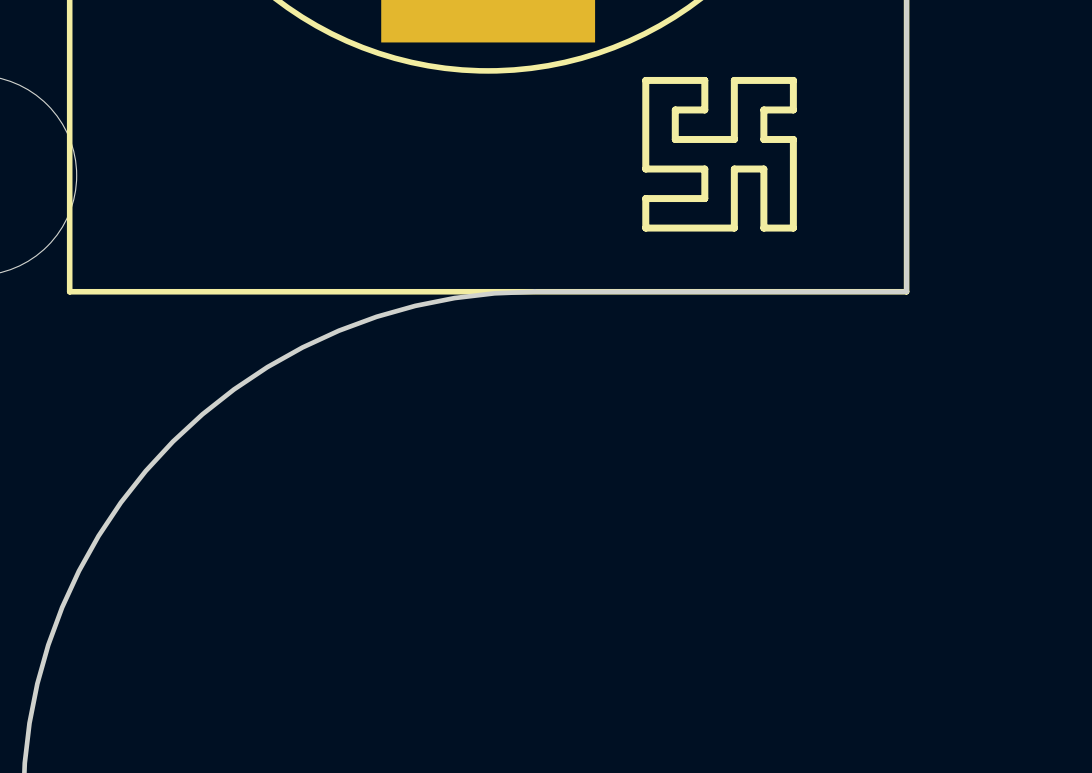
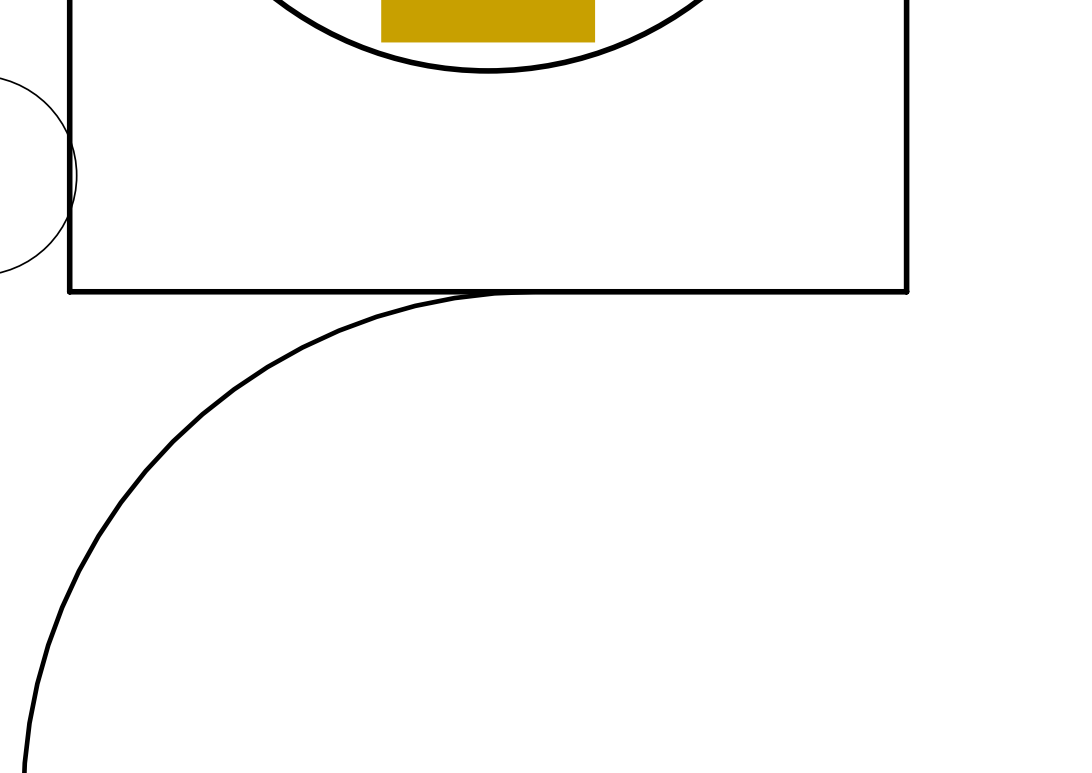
line: (645, 80) (645, 169) (704, 169) (704, 198) (645, 198) (645, 228) (734, 228) (734, 169) (763, 169) (763, 228) (793, 228) (793, 139) (763, 139) (763, 109) (793, 109) (793, 80) (734, 80) (734, 139) (675, 139) (675, 109) (704, 109) (704, 80) (645, 80) -> none

